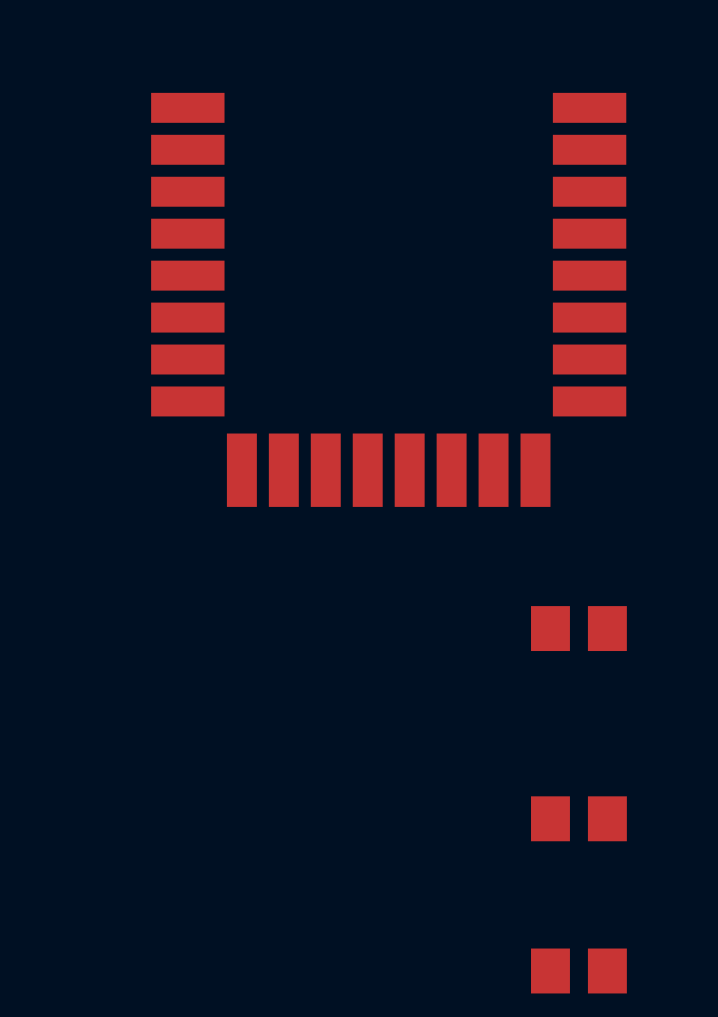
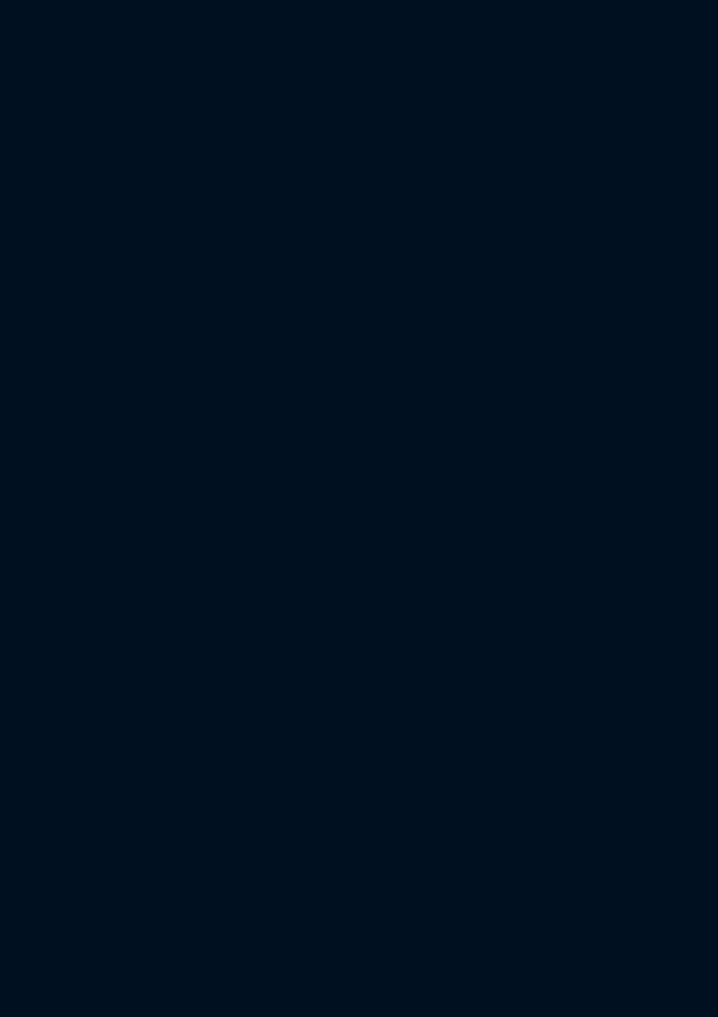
part: (388, 299) -> none
part: (578, 628) -> none
part: (578, 818) -> none
part: (578, 970) -> none

